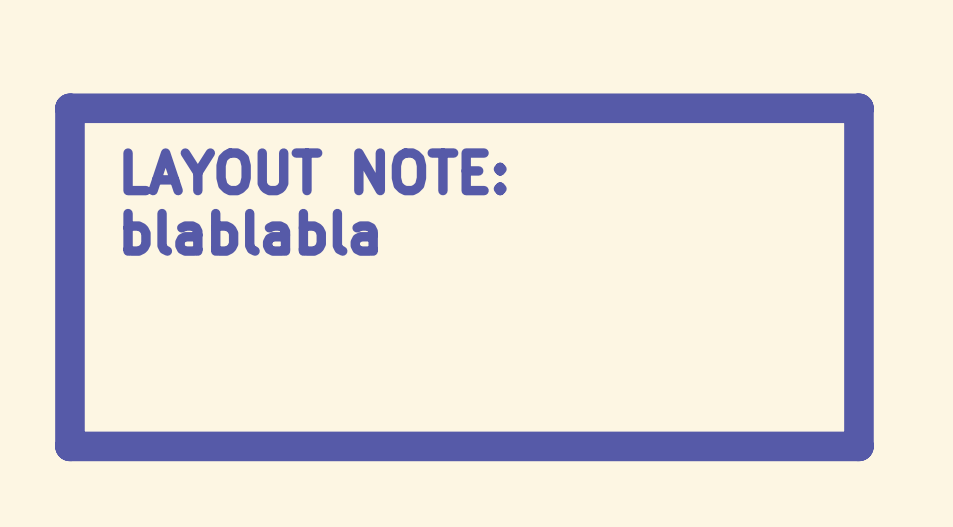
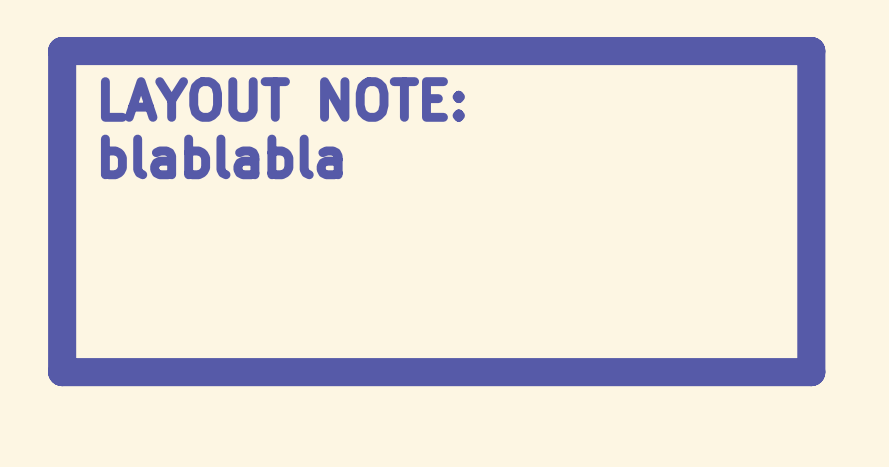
text position: LAYOUT NOTE: (315, 171) -> LAYOUT NOTE: (282, 99)
text position: blablabla (250, 232) -> blablabla (221, 156)

